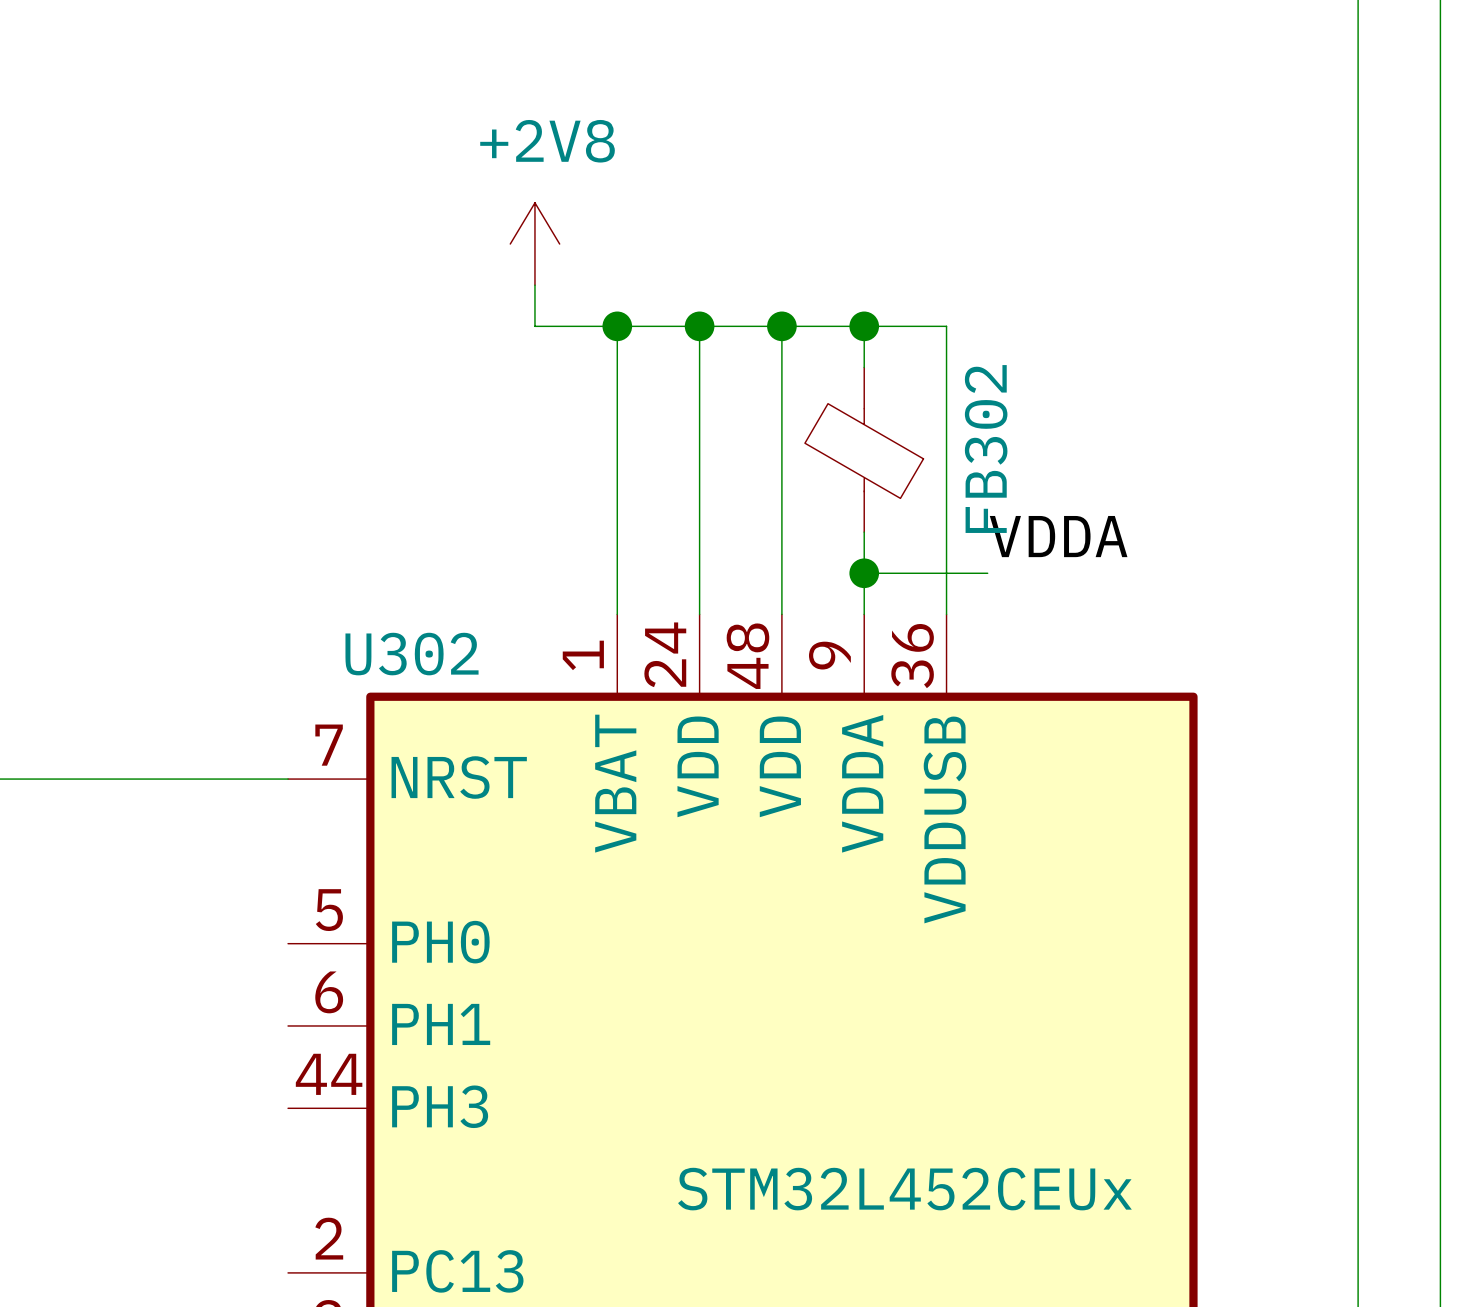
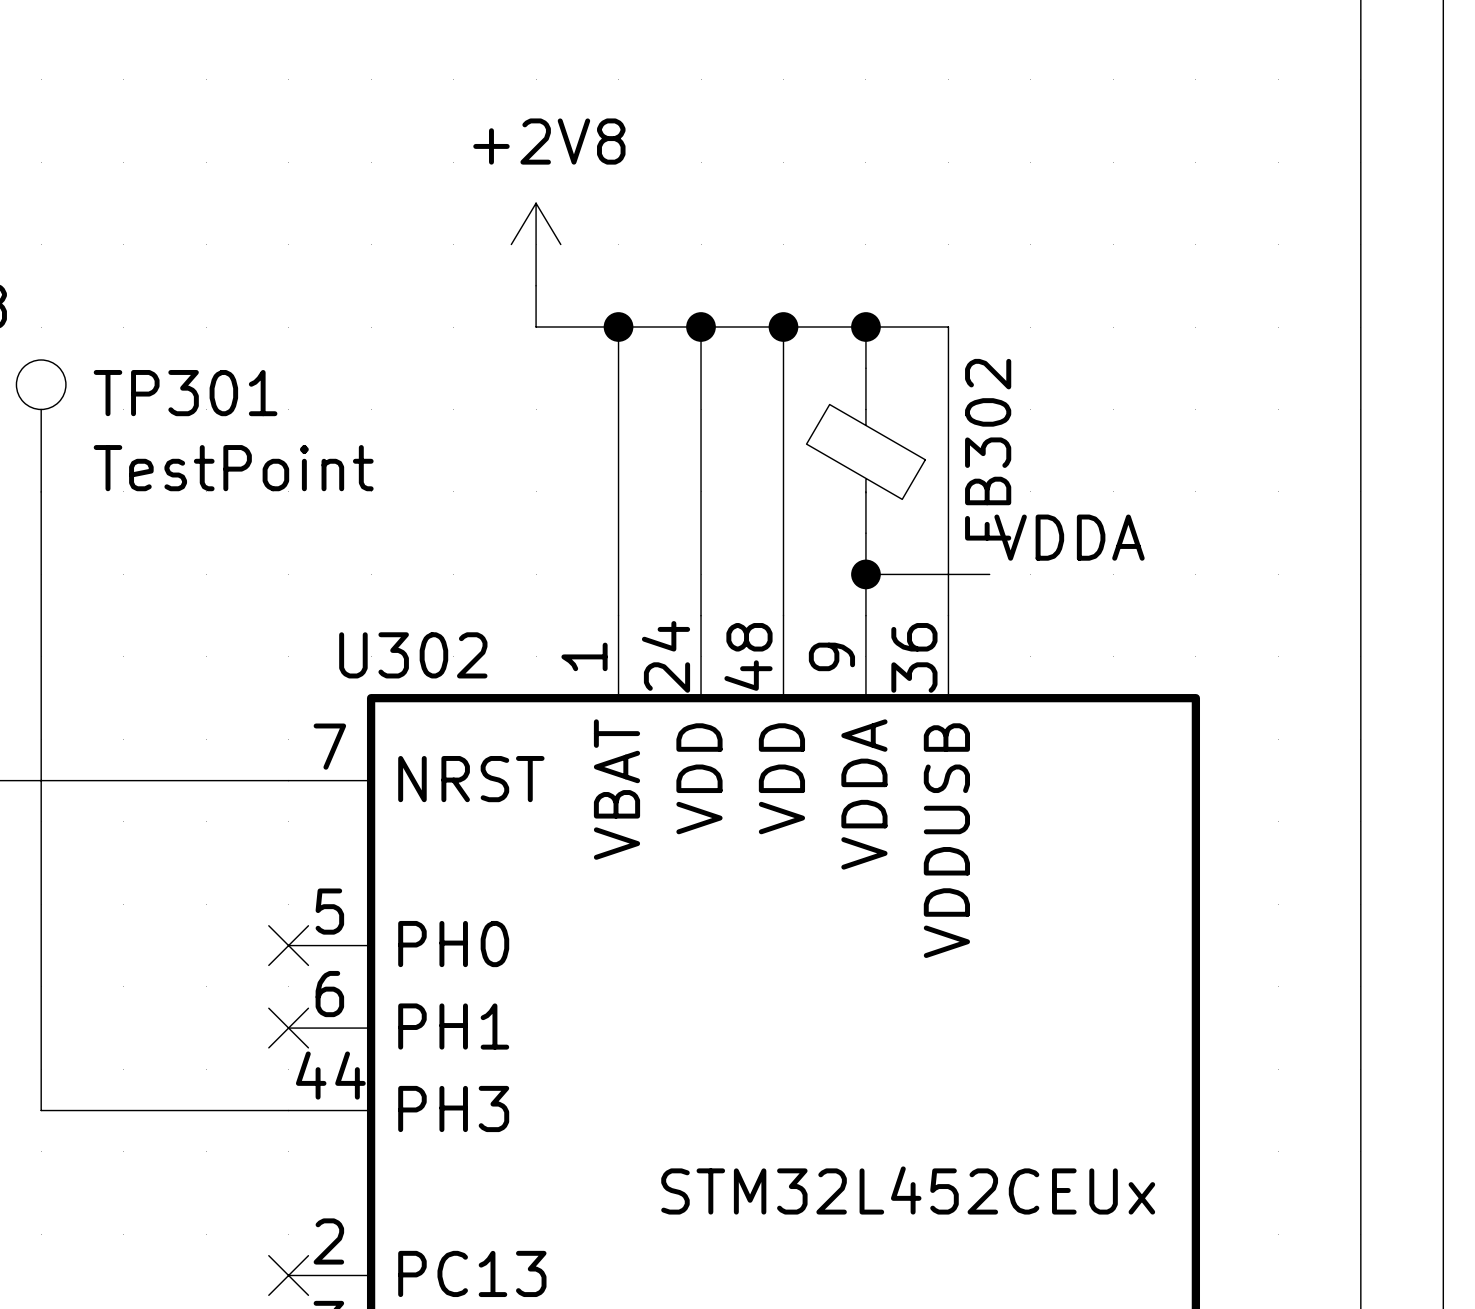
TP301: none -> TestPoint (41, 425)
wire: none -> (41, 491) (41, 1110) (288, 1110)
no-connect mark: none -> (288, 945)
no-connect mark: none -> (288, 1028)
no-connect mark: none -> (288, 1275)

